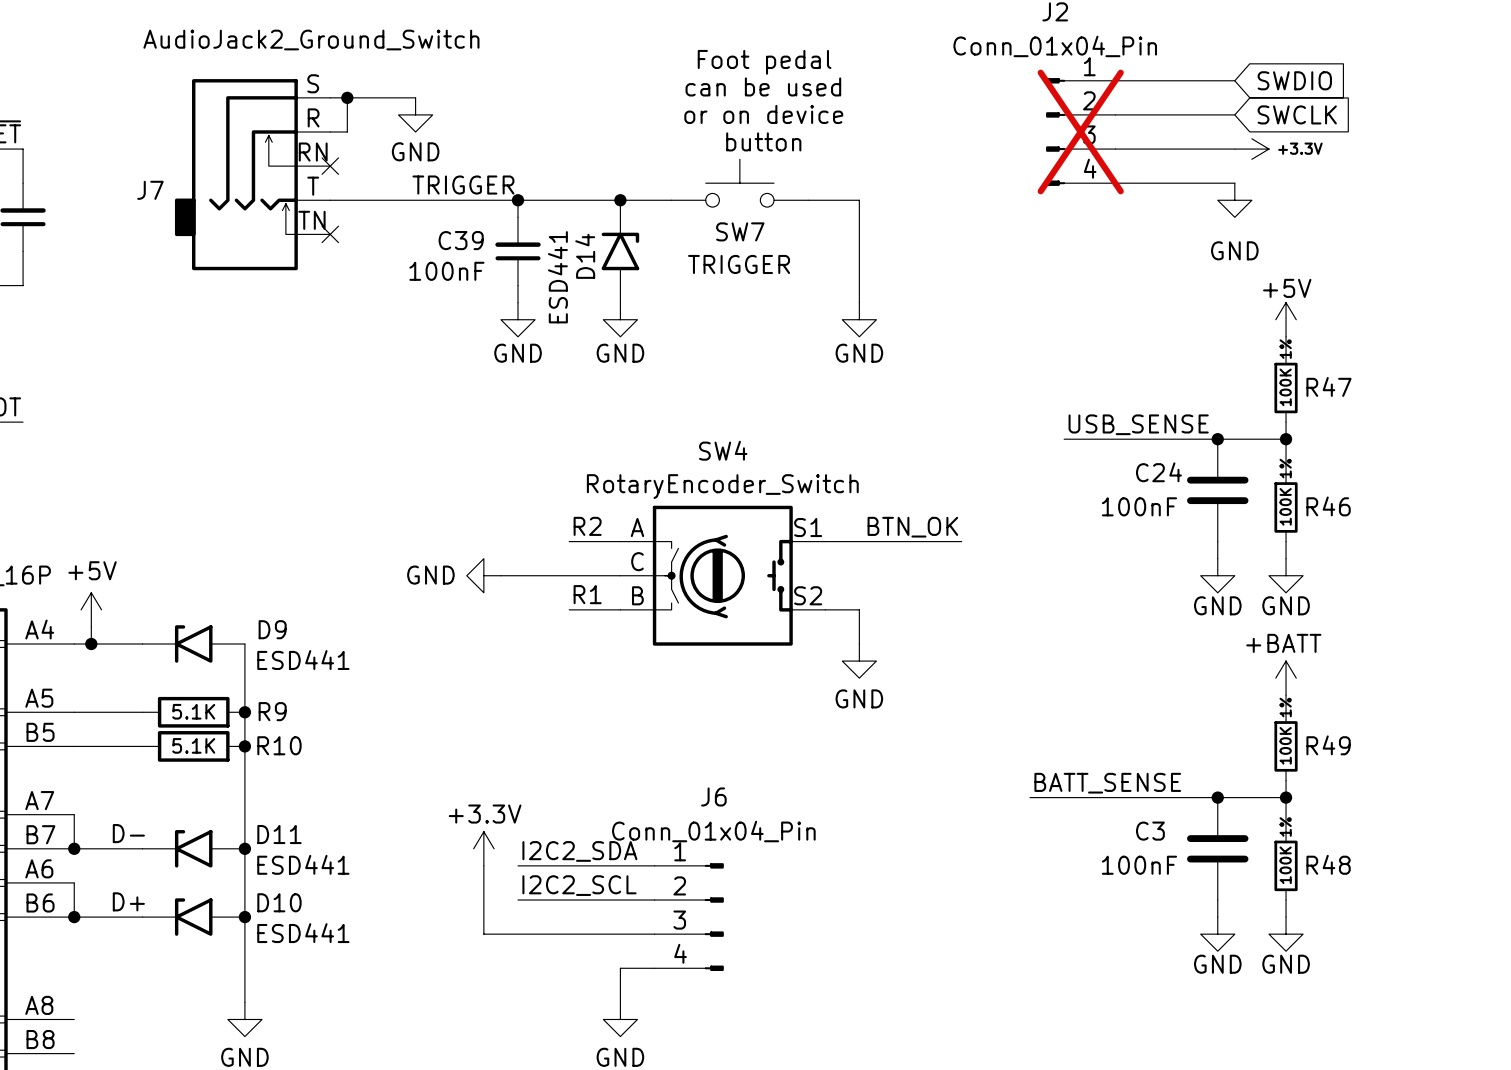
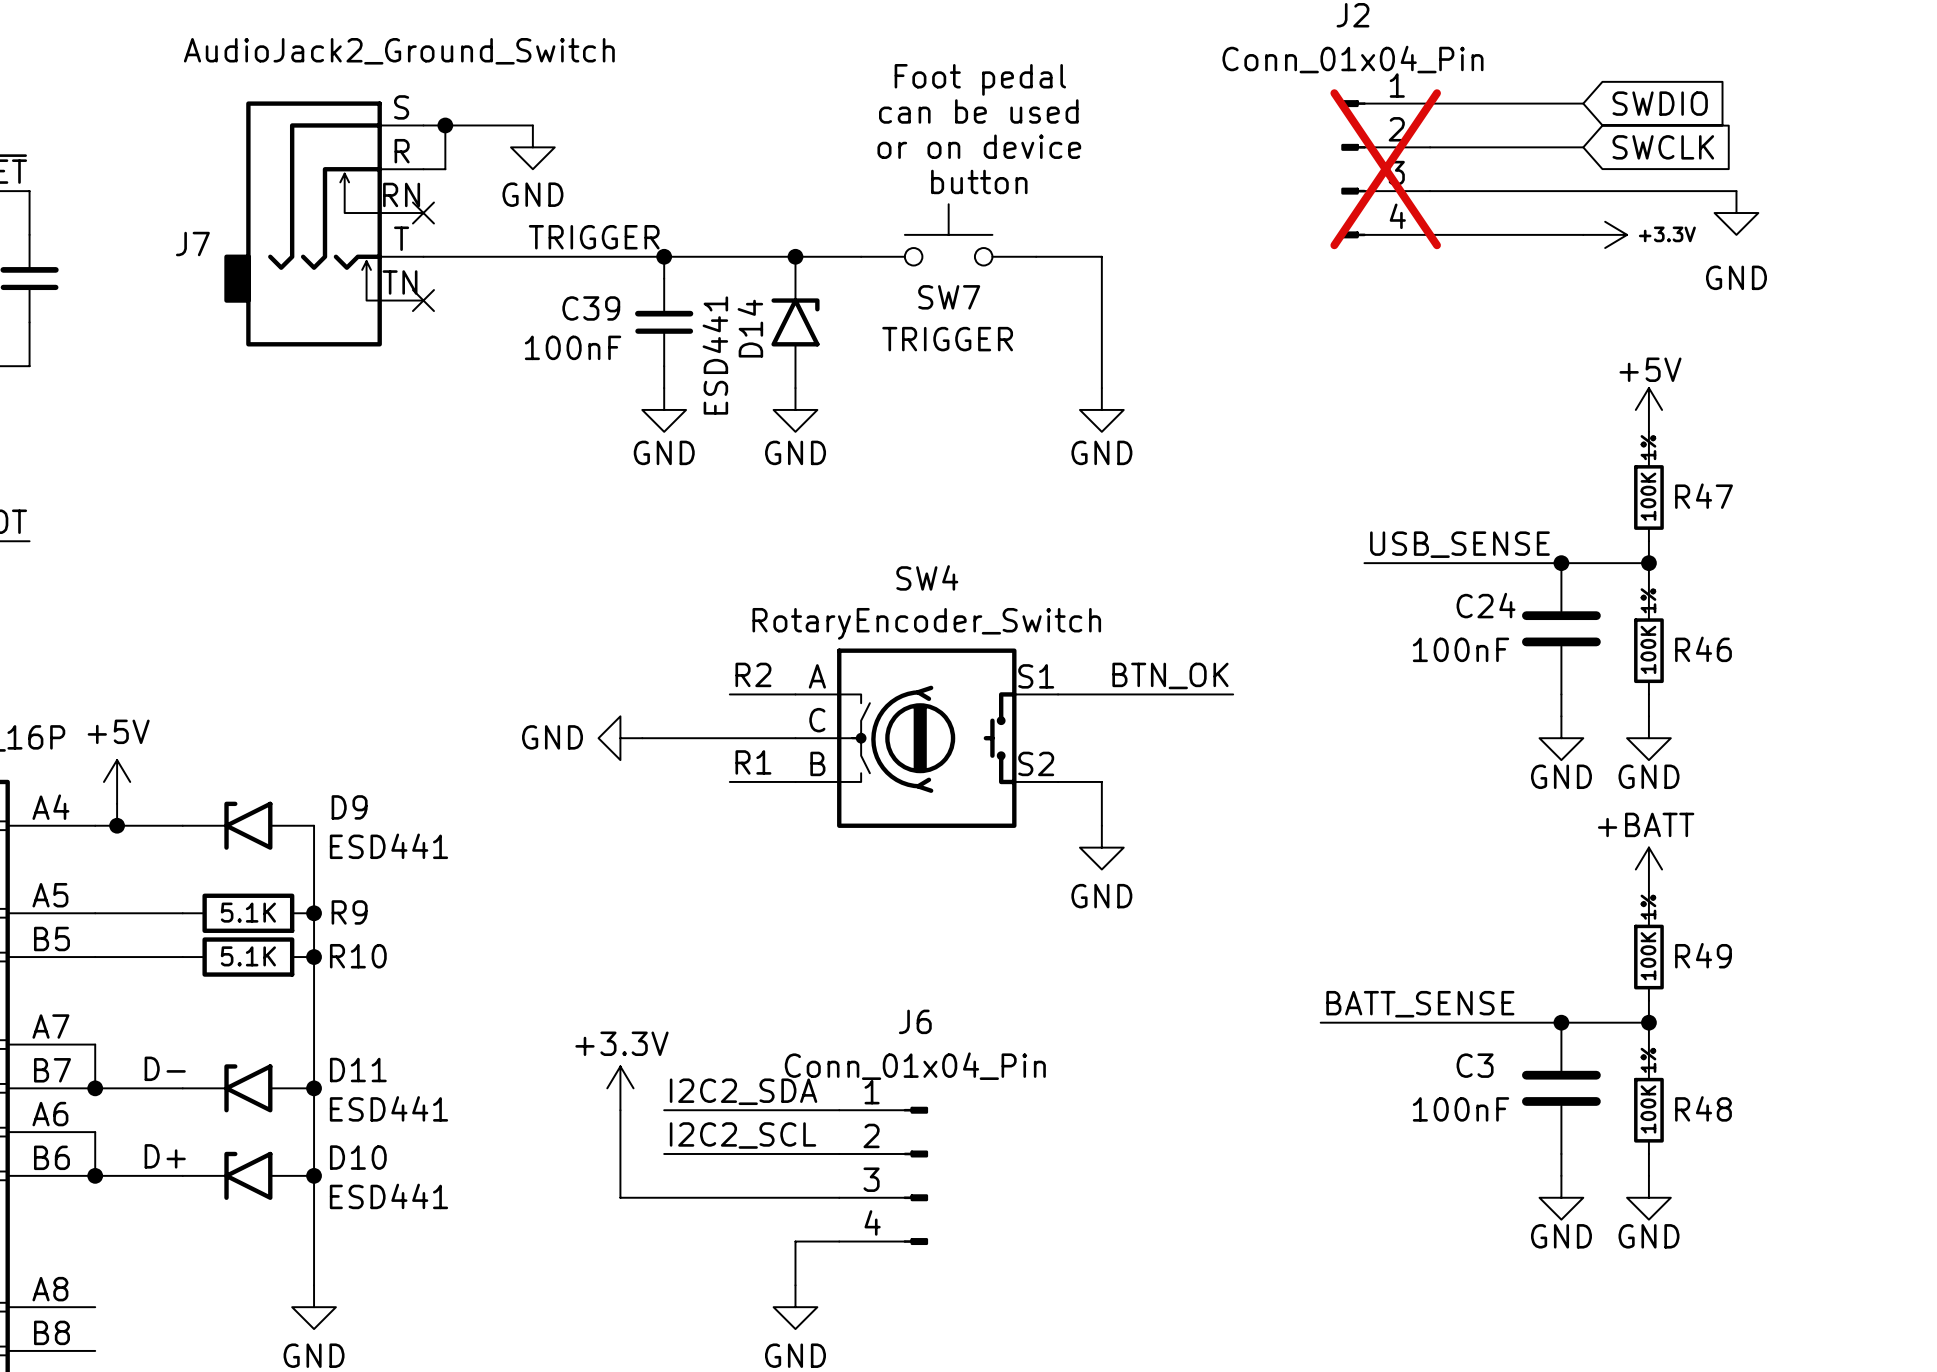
wire: none -> (1583, 191) (1736, 191)
power symbol position: +3.3V (1251, 149) -> +3.3V (1605, 234)
power symbol position: GND (1234, 200) -> GND (1736, 213)

